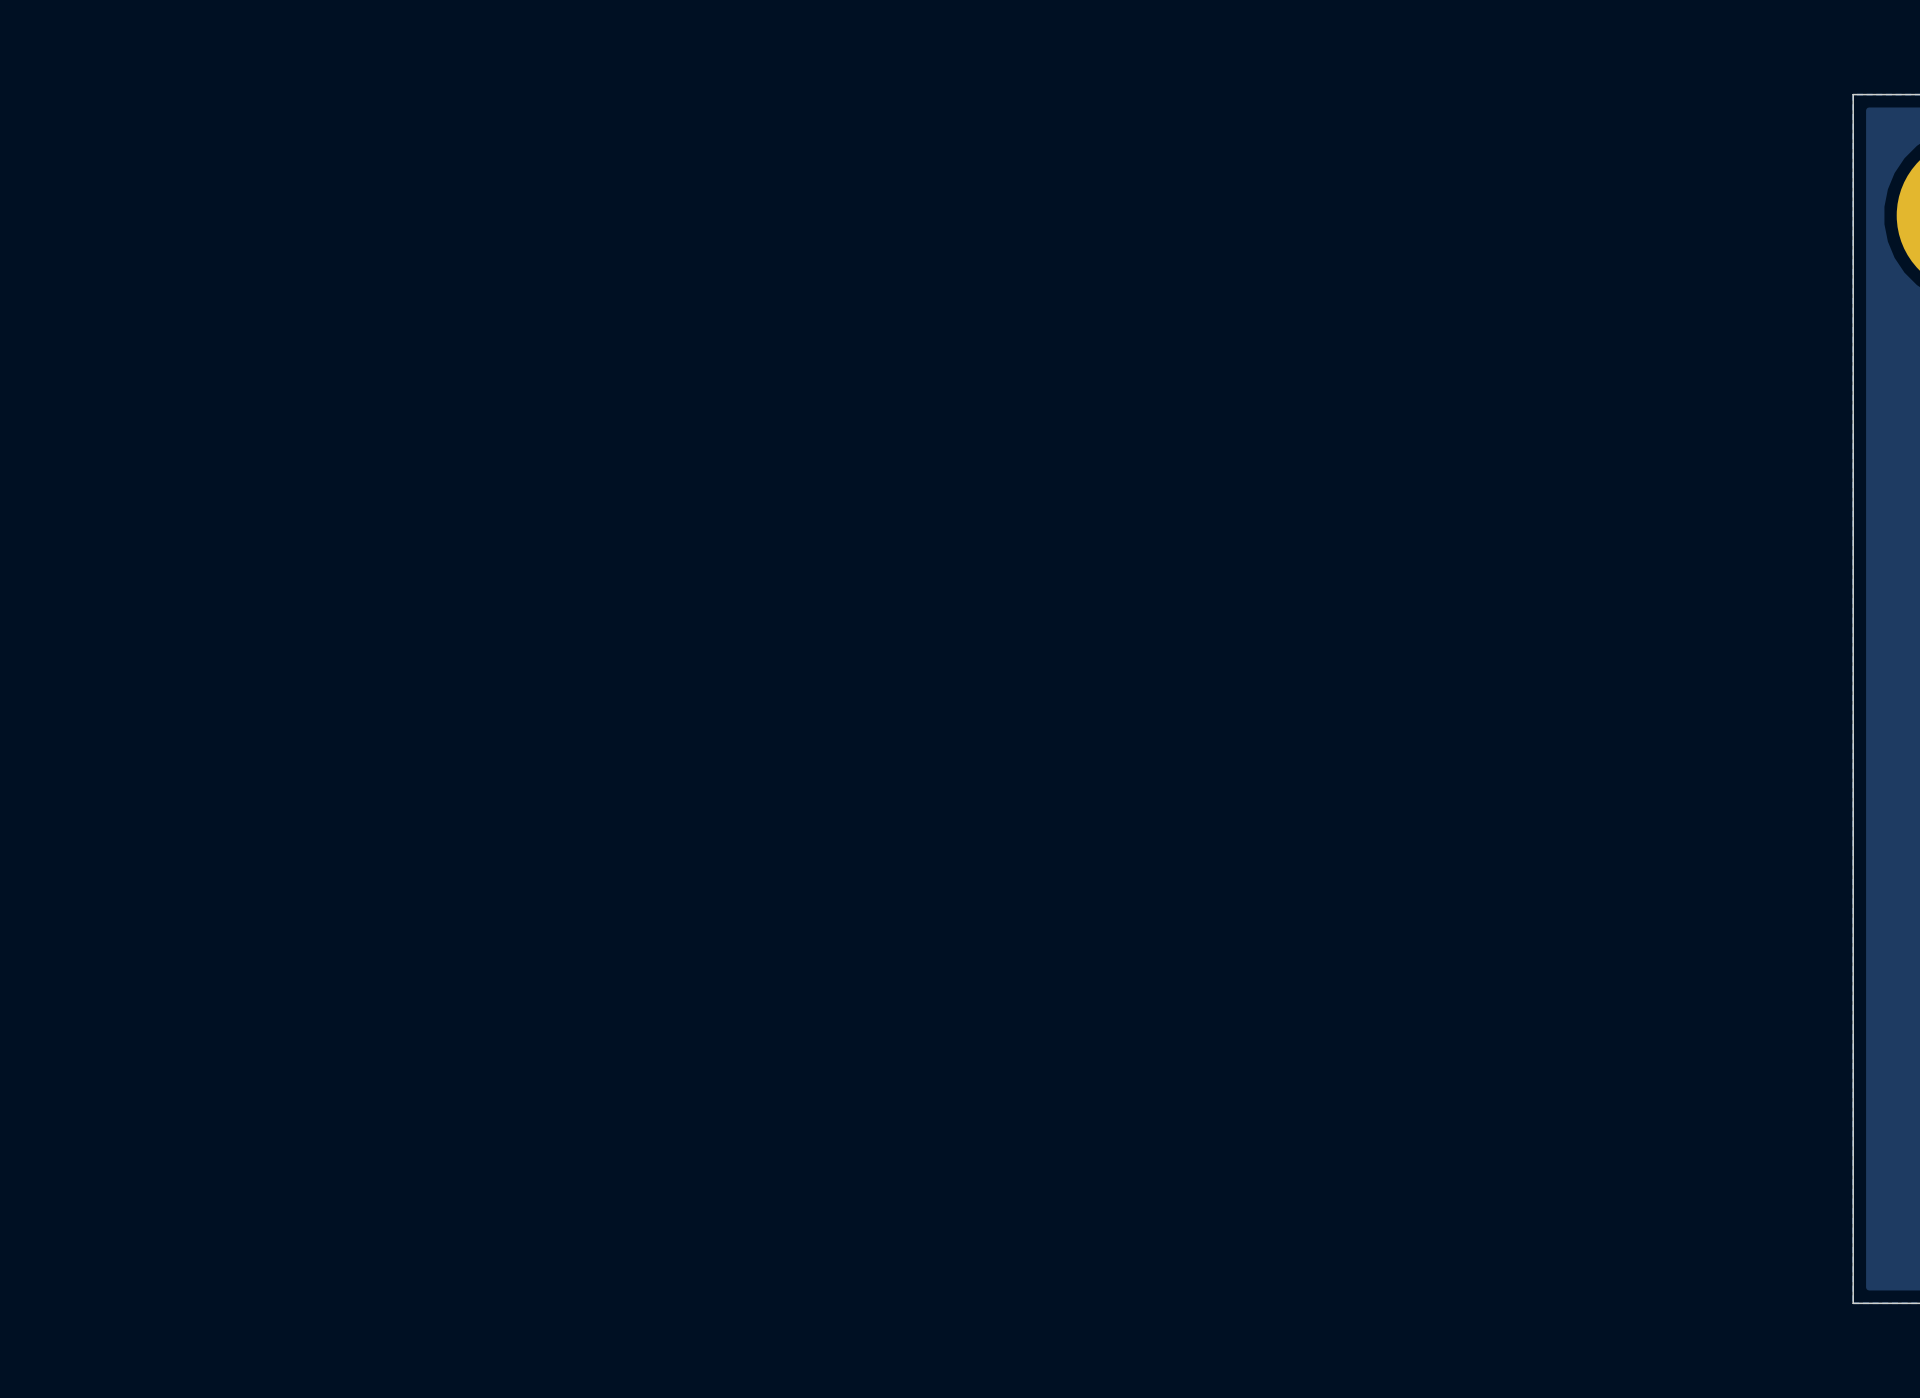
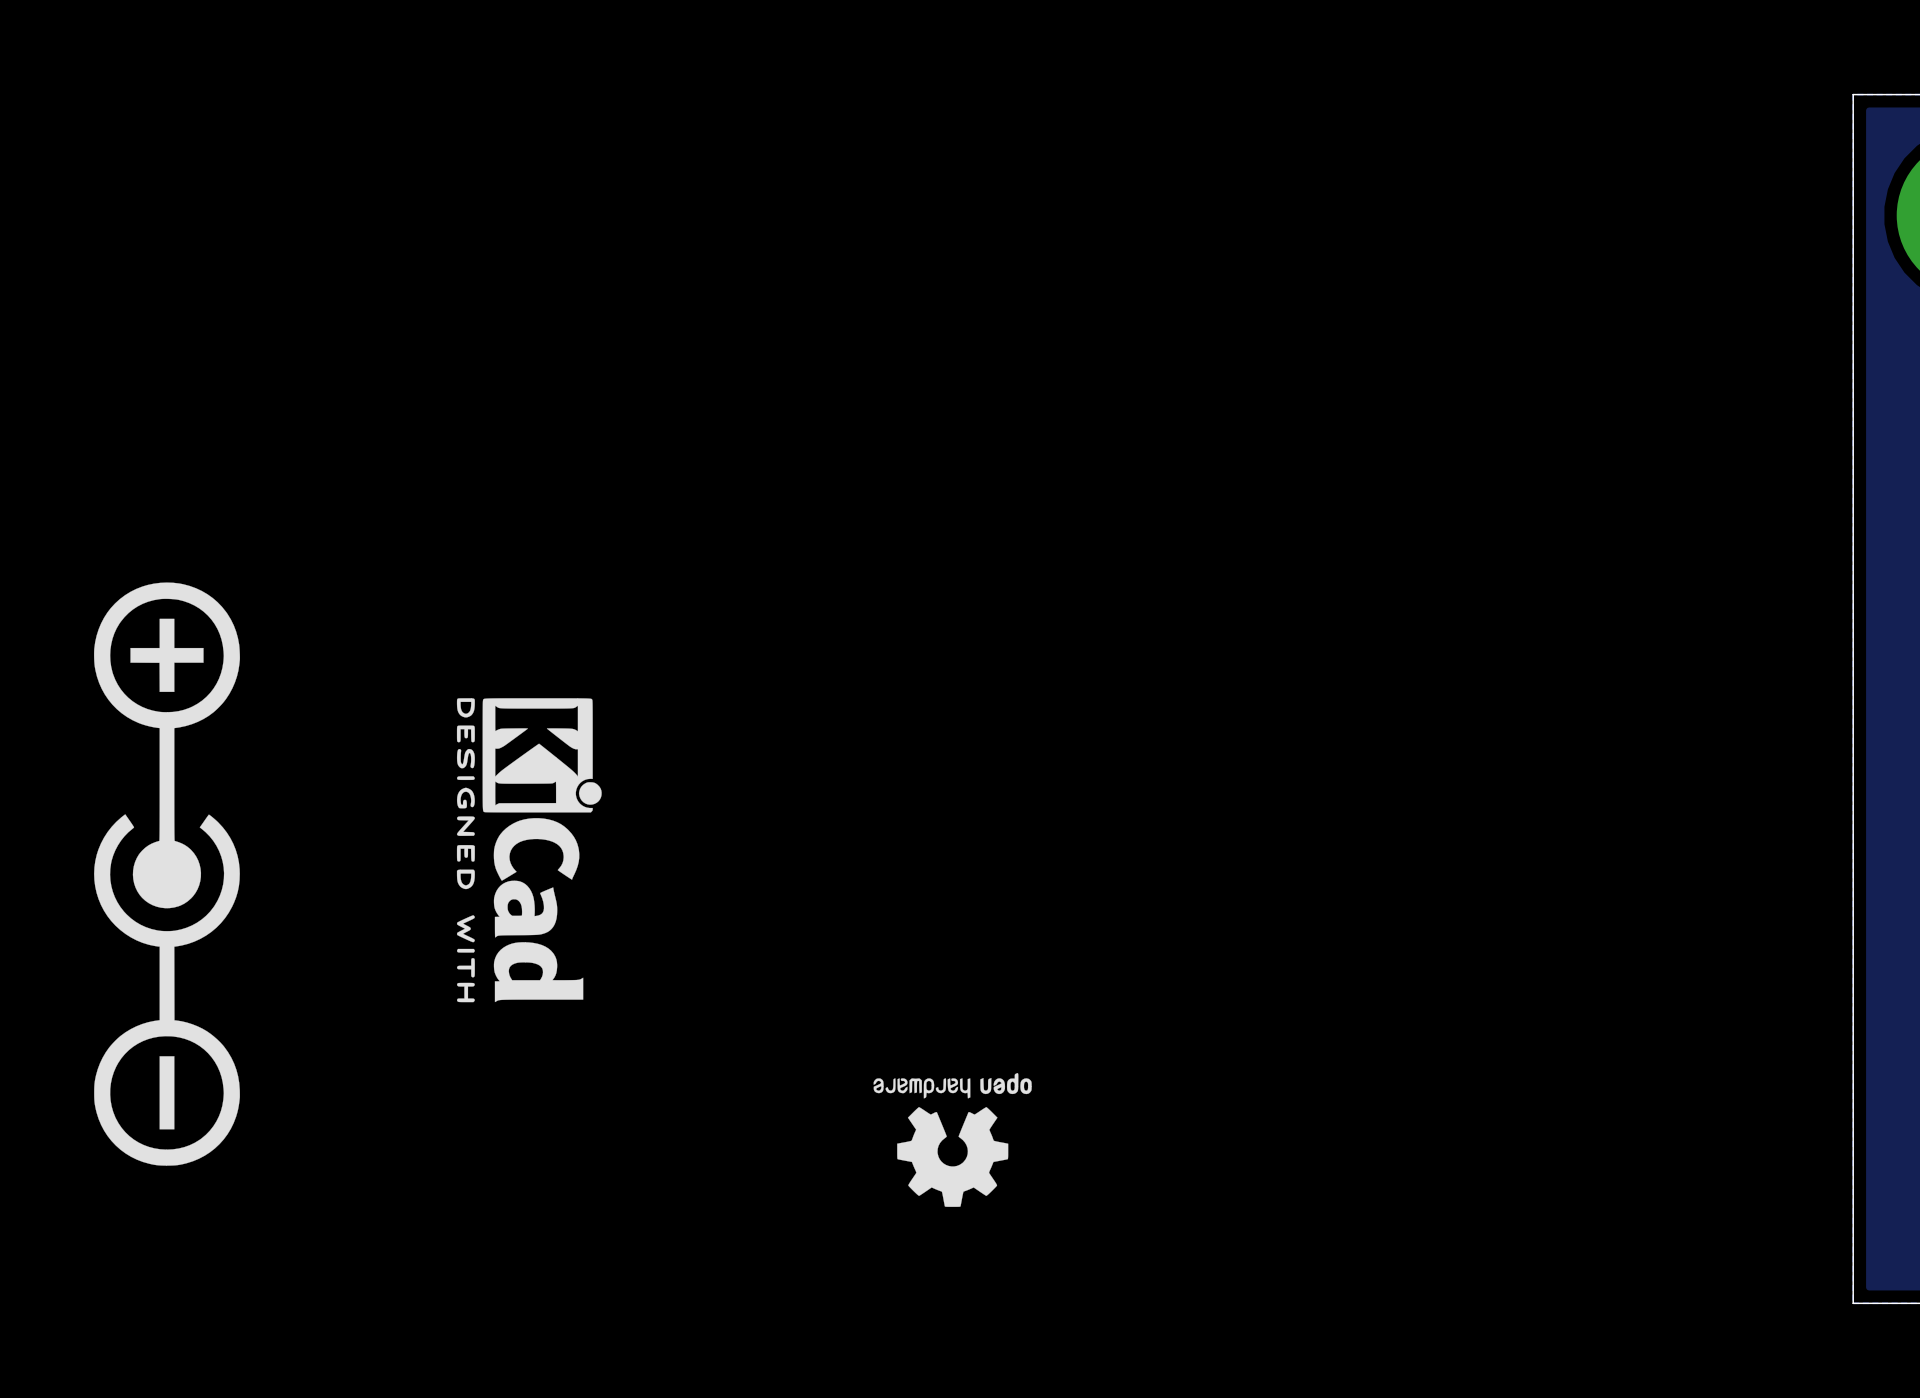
drawing: none -> [93, 582, 241, 1166]
drawing: none -> [456, 698, 602, 1003]
drawing: none -> [873, 1073, 1032, 1207]

